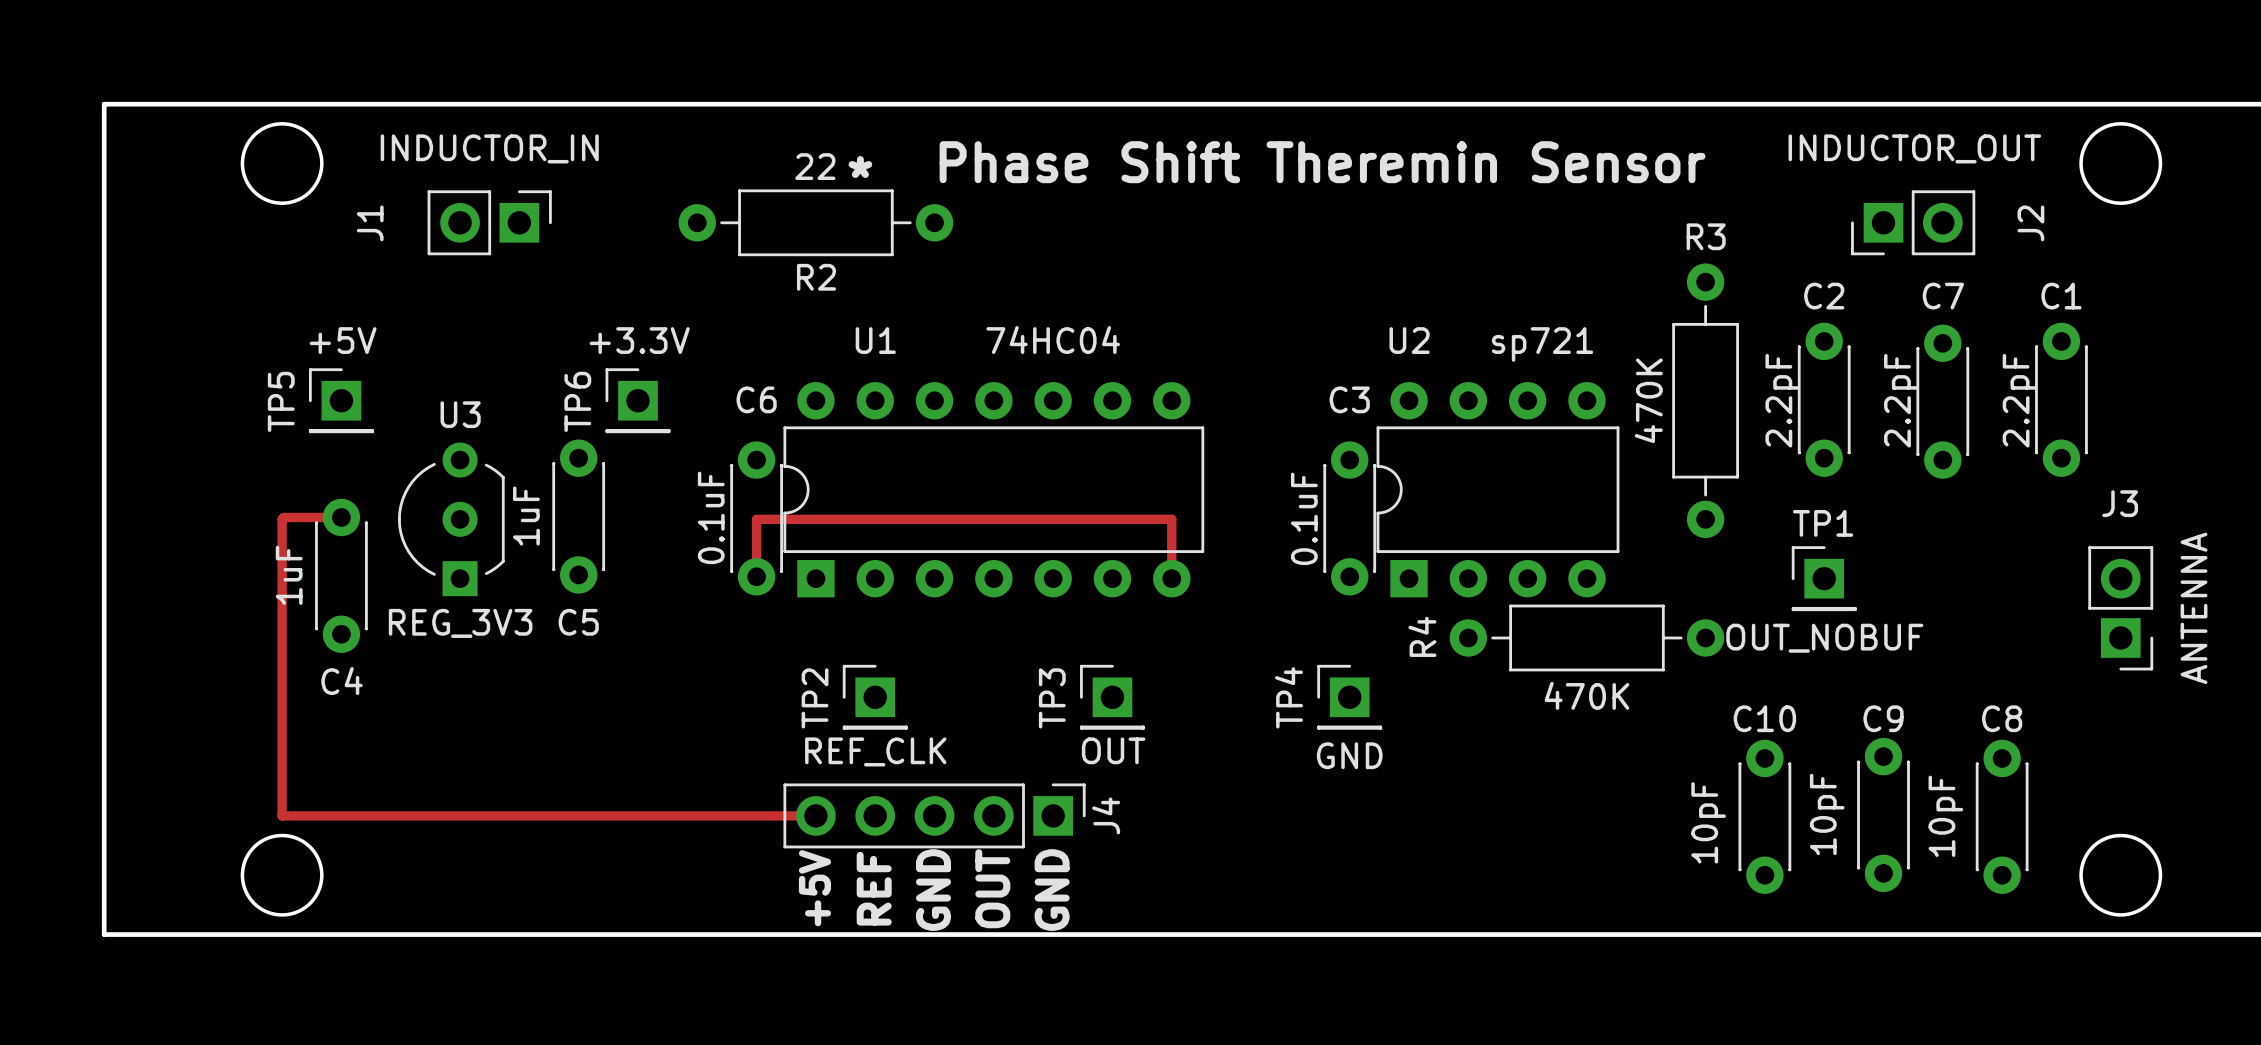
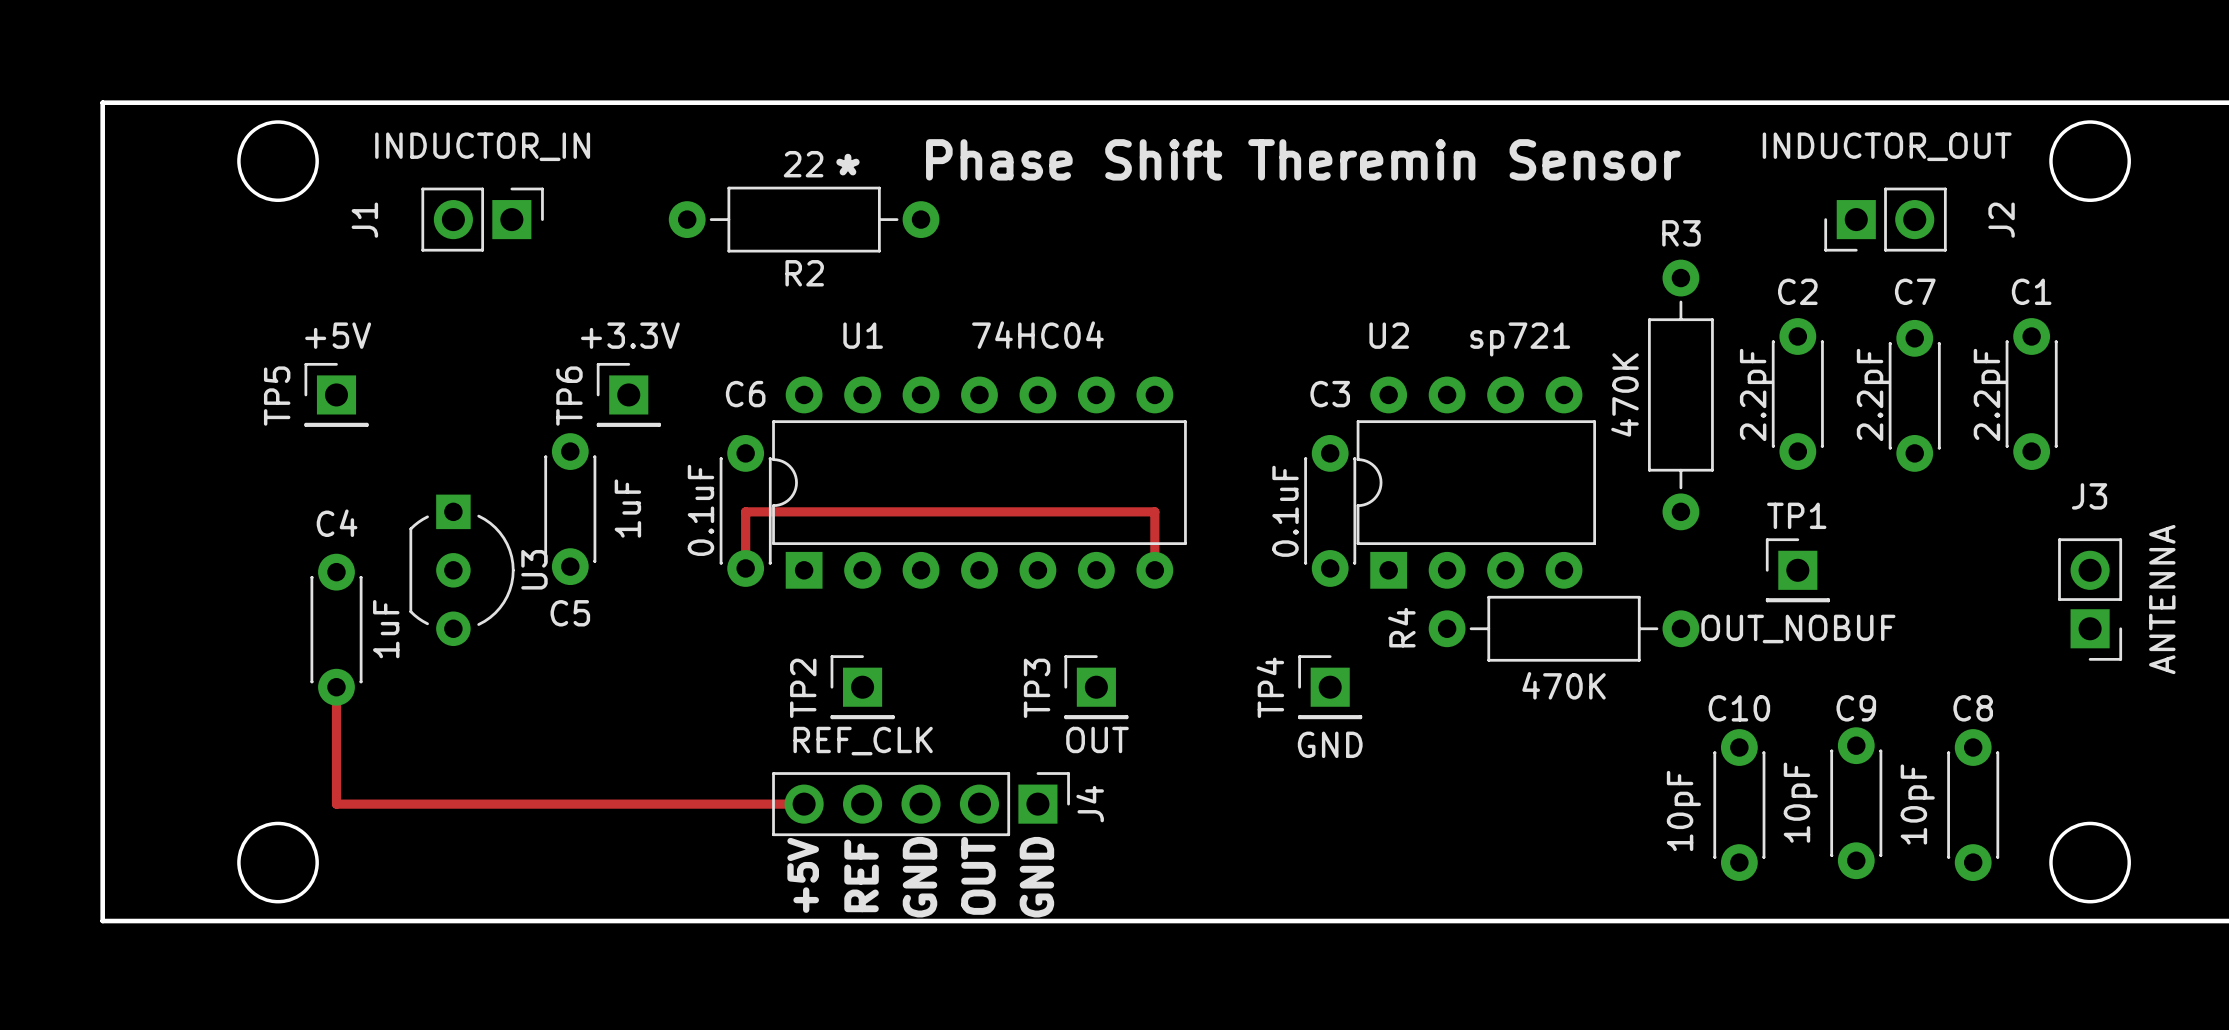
U3 name position: U3 (460, 414) -> U3 (534, 569)
C5 value position: 1uF (526, 516) -> 1uF (627, 508)
track: (341, 517) (283, 517) (282, 519) (282, 815) (341, 815) -> (336, 687) (336, 804)
U3 rotation: 0° (451, 519) -> 180° (462, 570)
C4 value position: 1uF (289, 575) -> 1uF (386, 629)
C4 position: (341, 575) -> (336, 629)
U3 value: REG_3V3 (460, 623) -> none
C4 name position: C4 (341, 681) -> C4 (337, 523)

